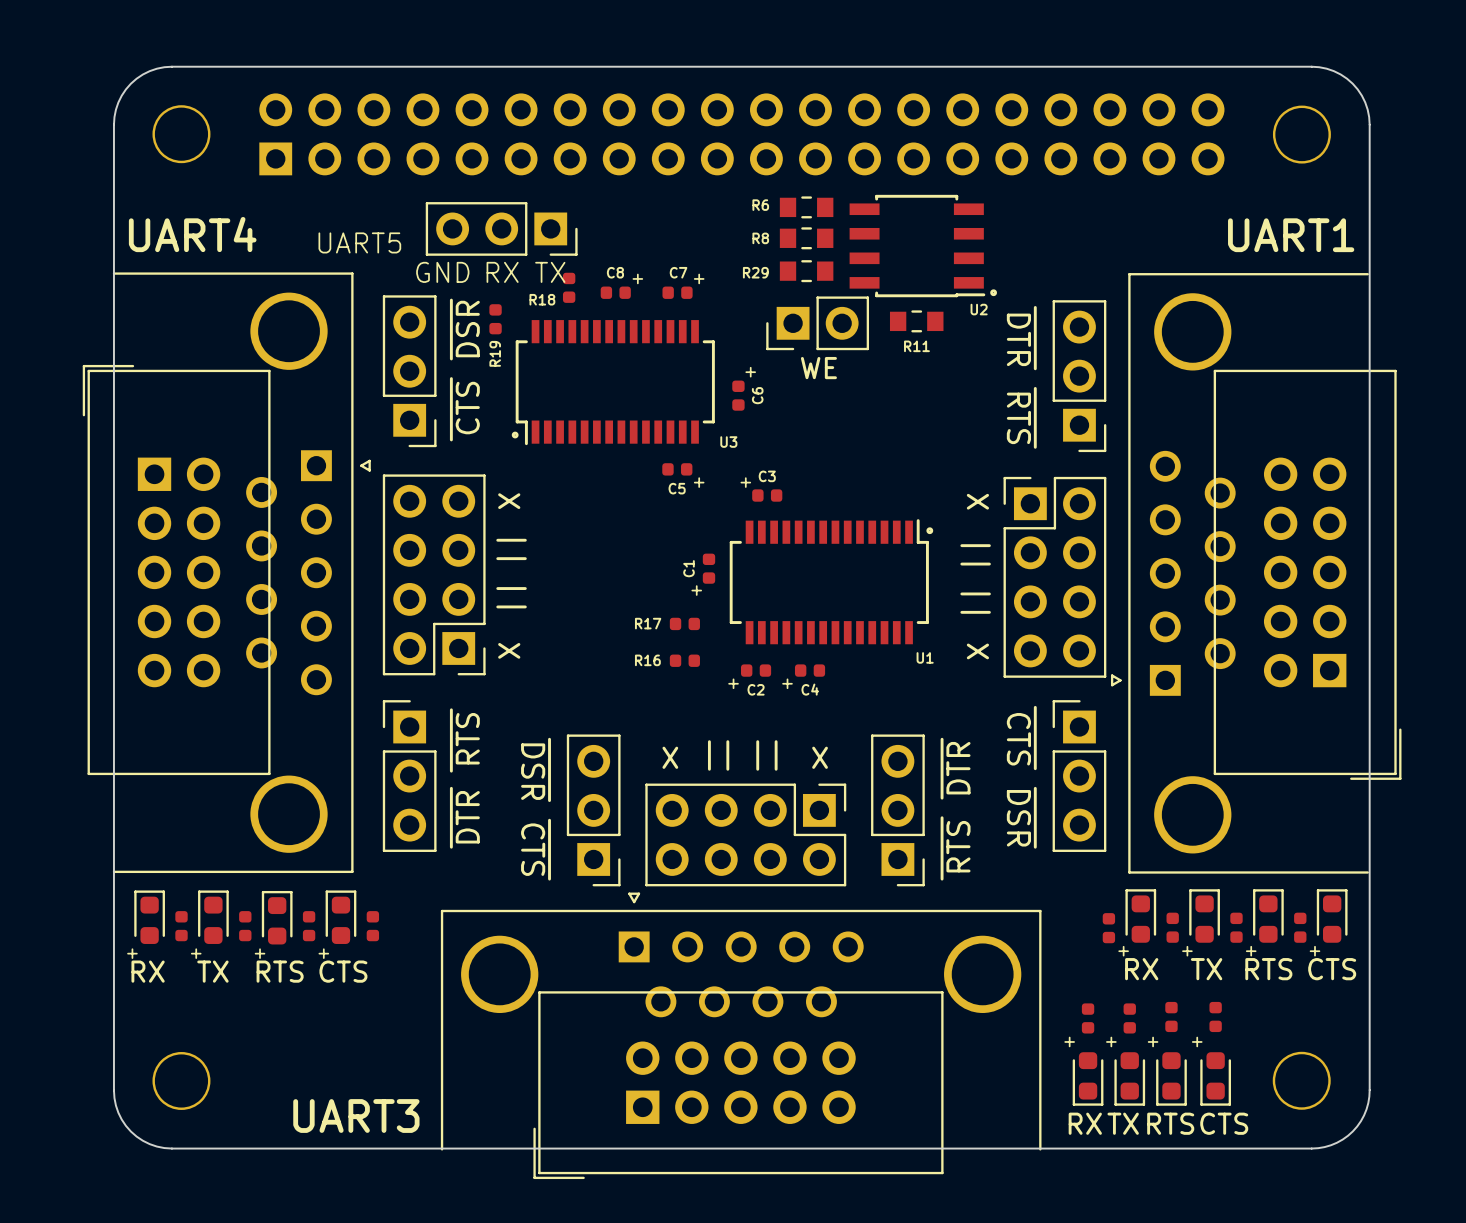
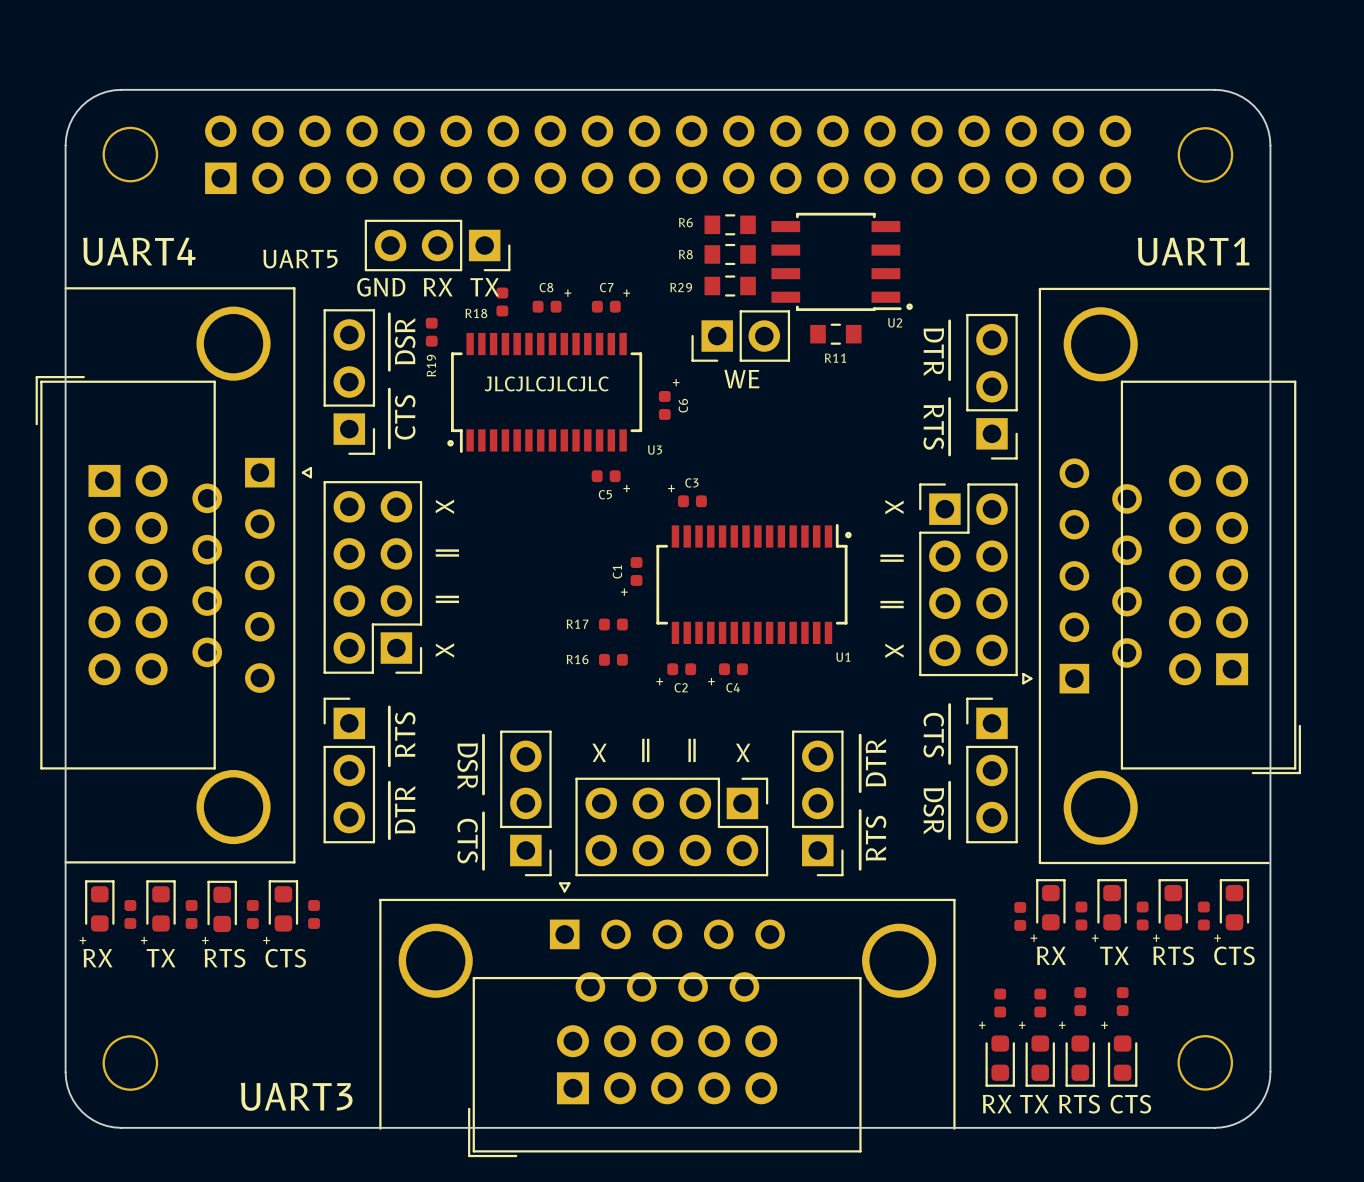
text: none -> JLCJLCJLCJLC (546, 383)

